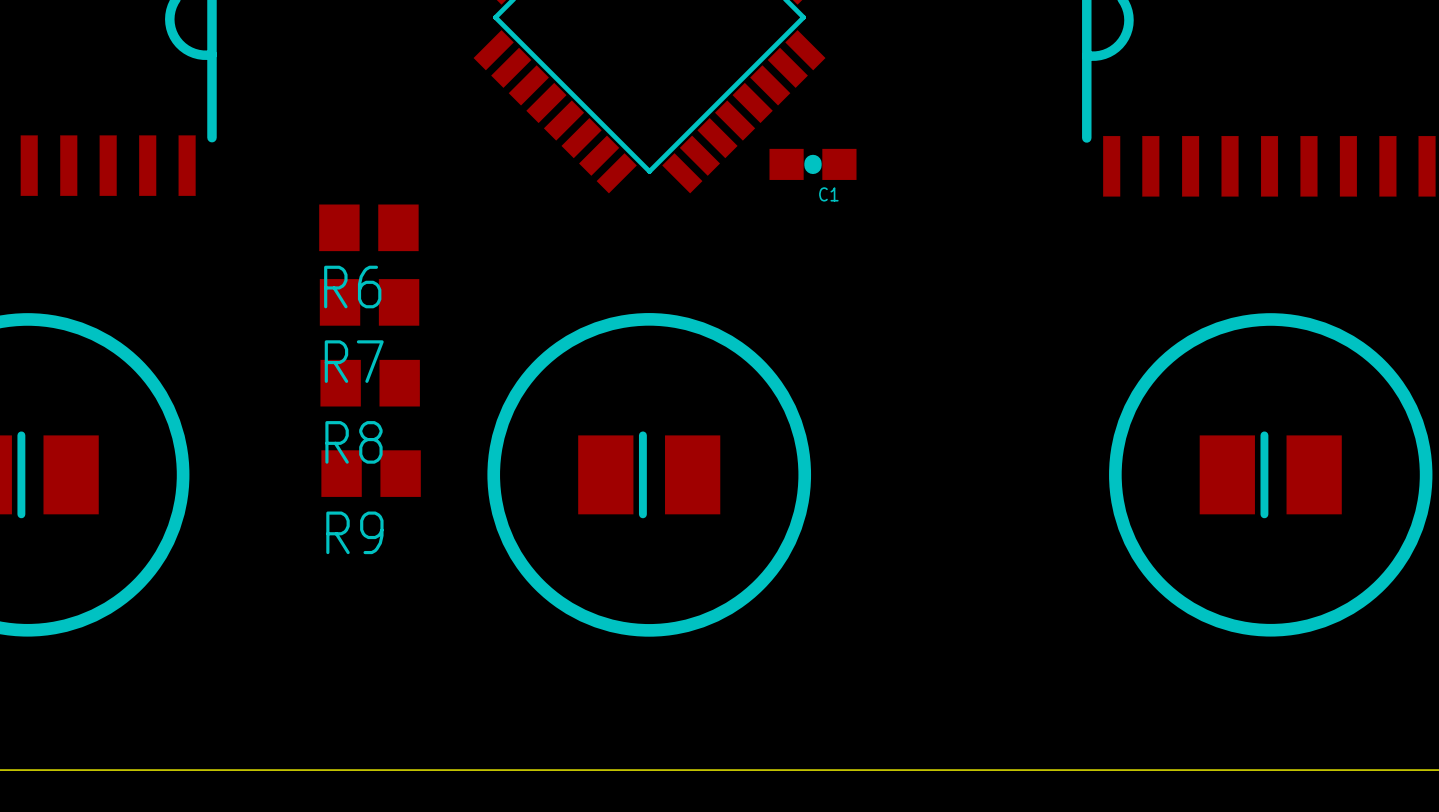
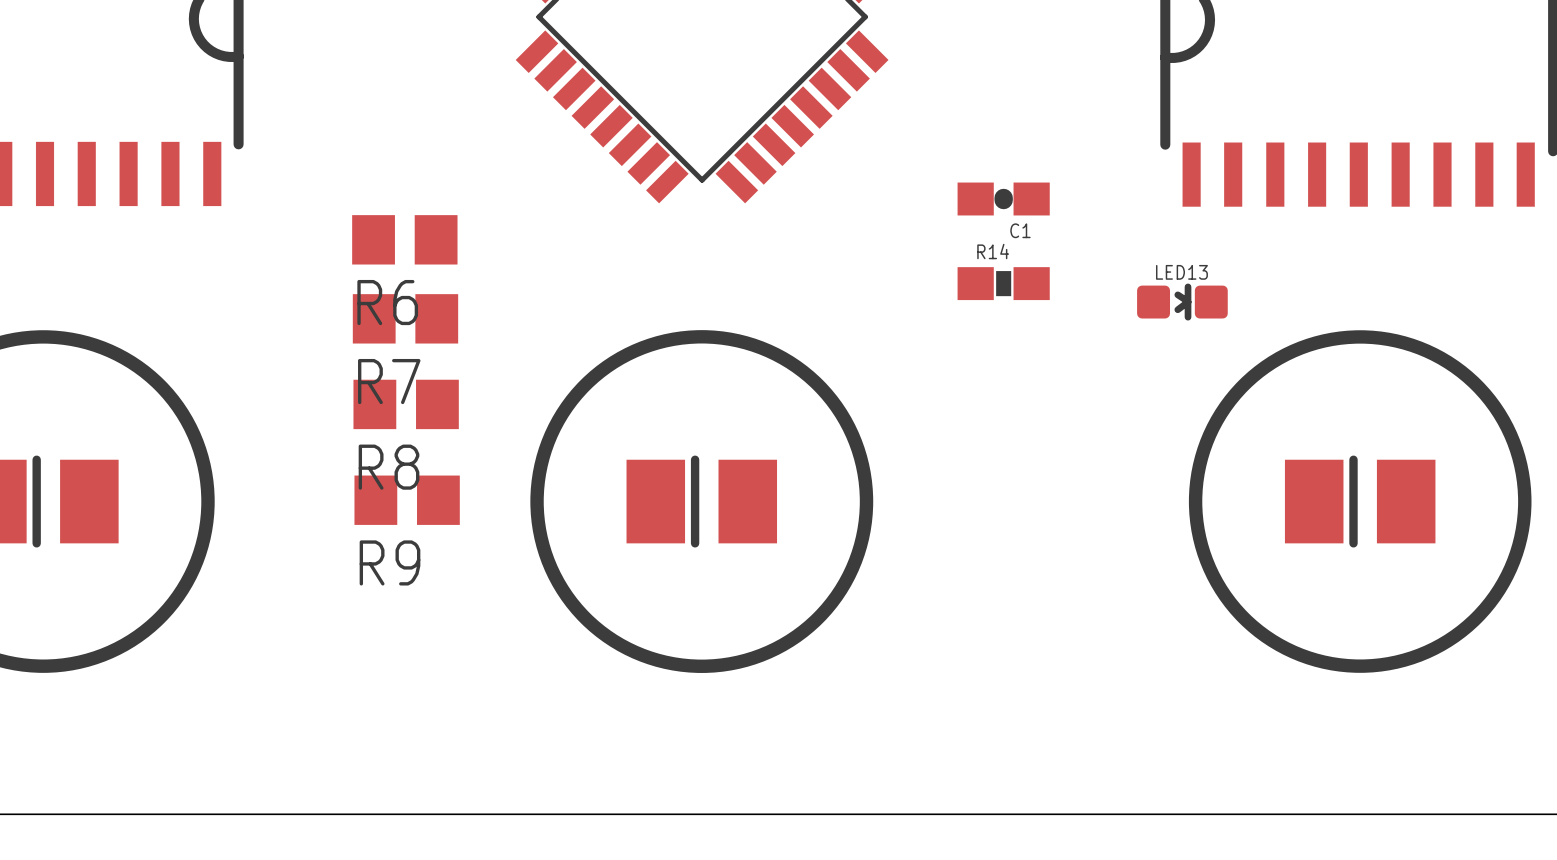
C1 position: (812, 164) -> (1003, 199)
R14: none -> (1003, 283)
LED13: none -> (1182, 302)

